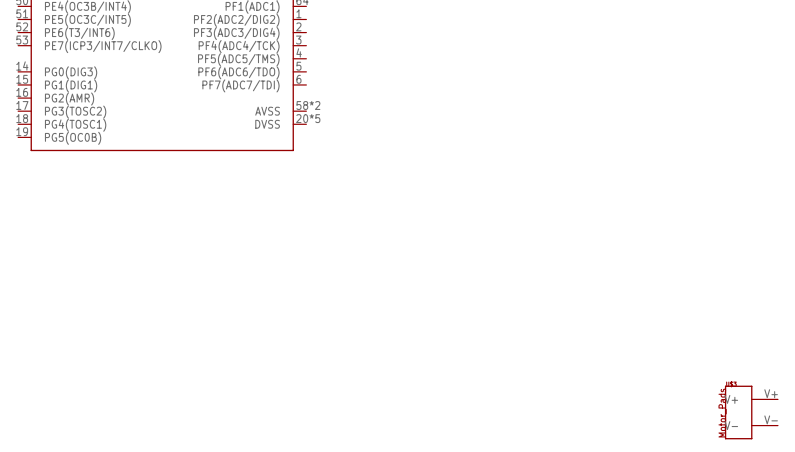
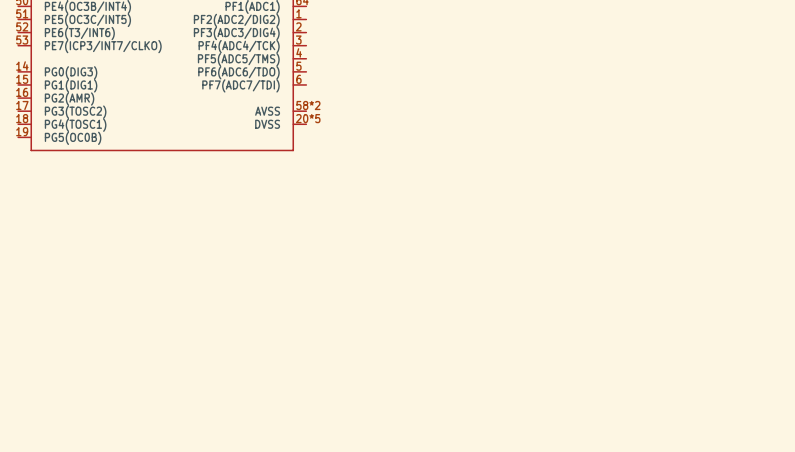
part: (751, 412) -> none

